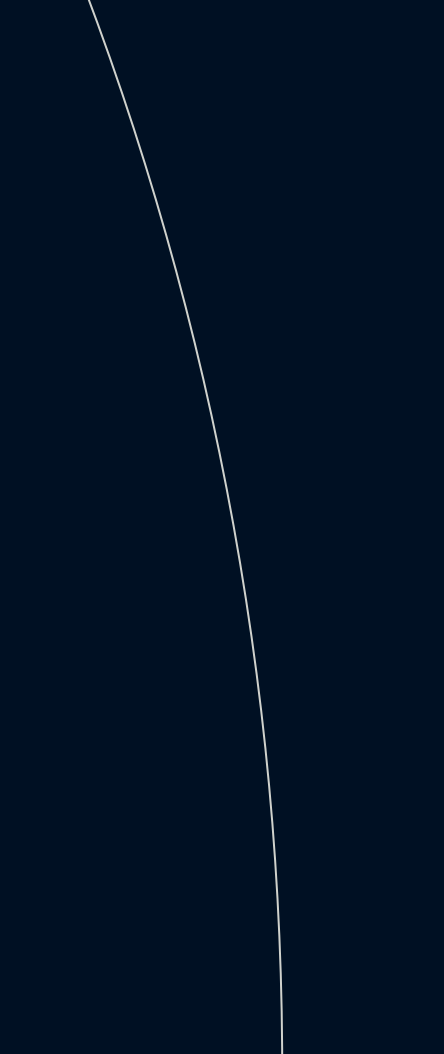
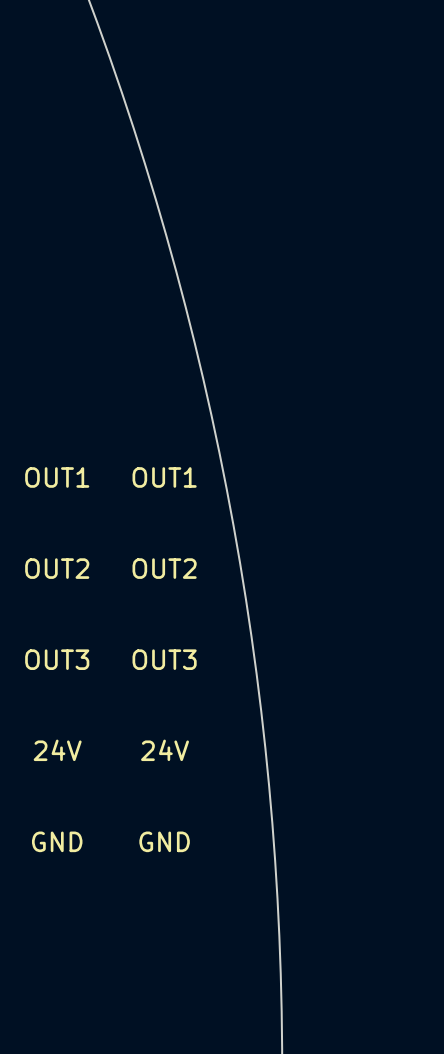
text: none -> OUT1 (57, 477)
text: none -> OUT1 (164, 477)
text: none -> OUT2 (57, 568)
text: none -> OUT2 (164, 568)
text: none -> OUT3 (57, 659)
text: none -> OUT3 (164, 659)
text: none -> 24V (57, 750)
text: none -> 24V (165, 750)
text: none -> GND (57, 841)
text: none -> GND (164, 841)

